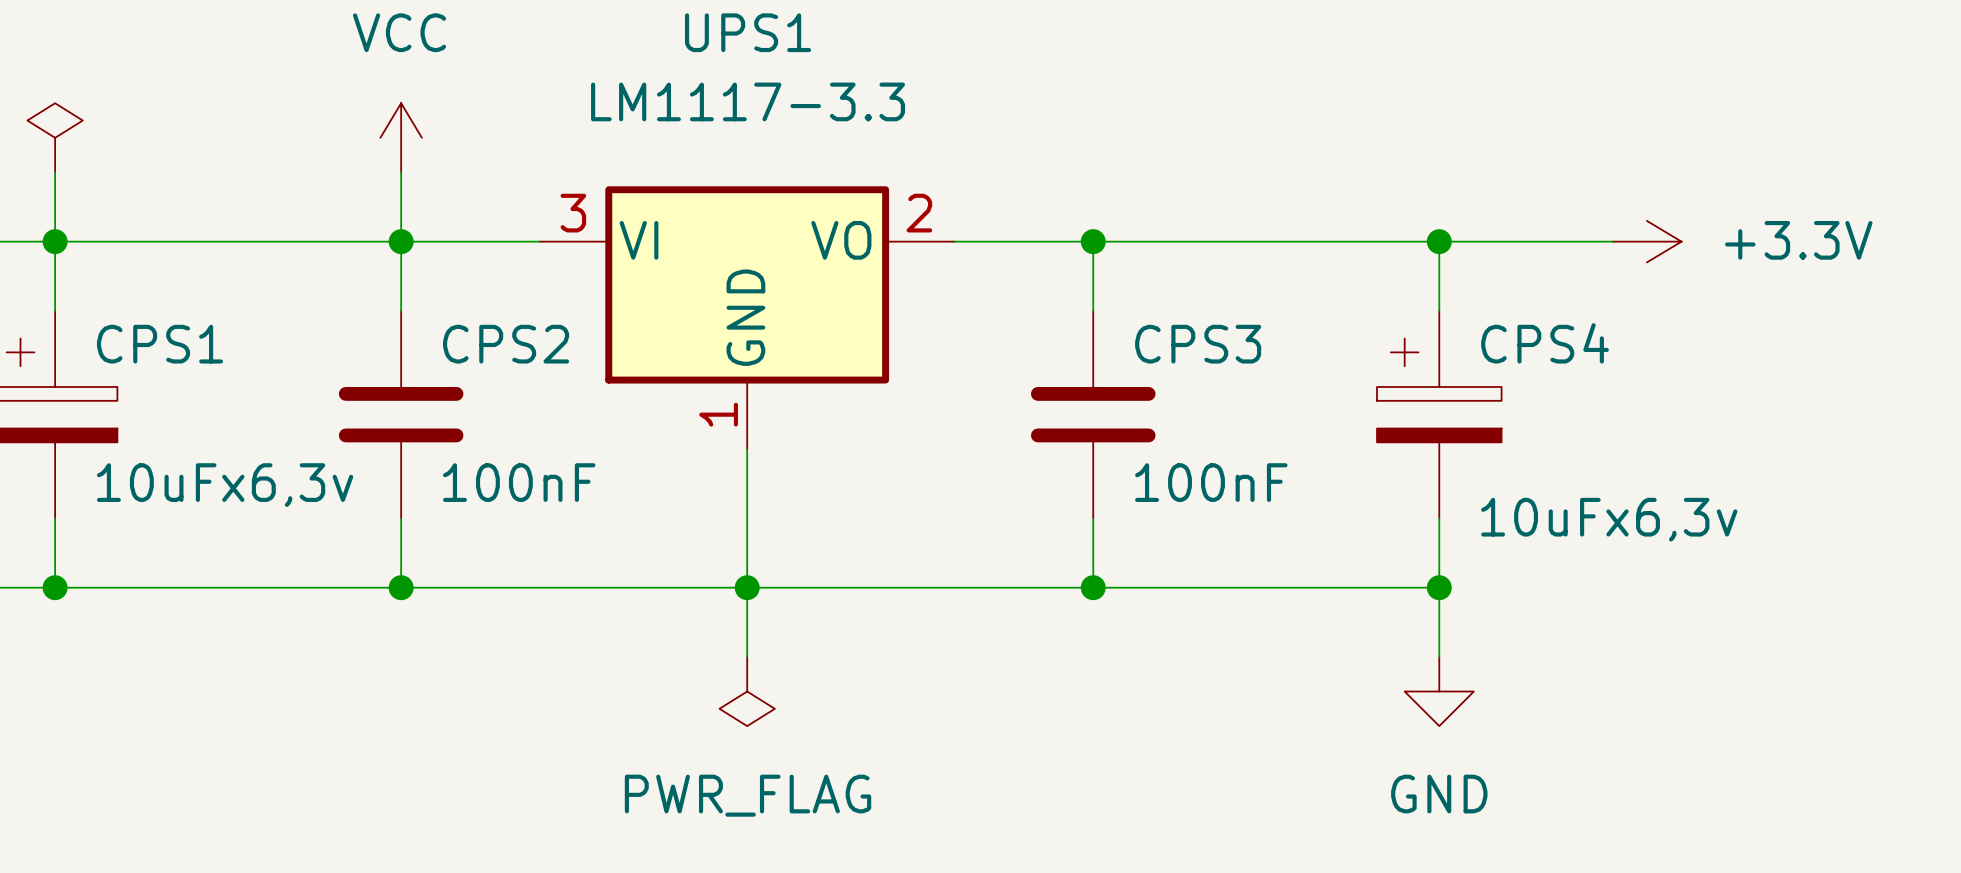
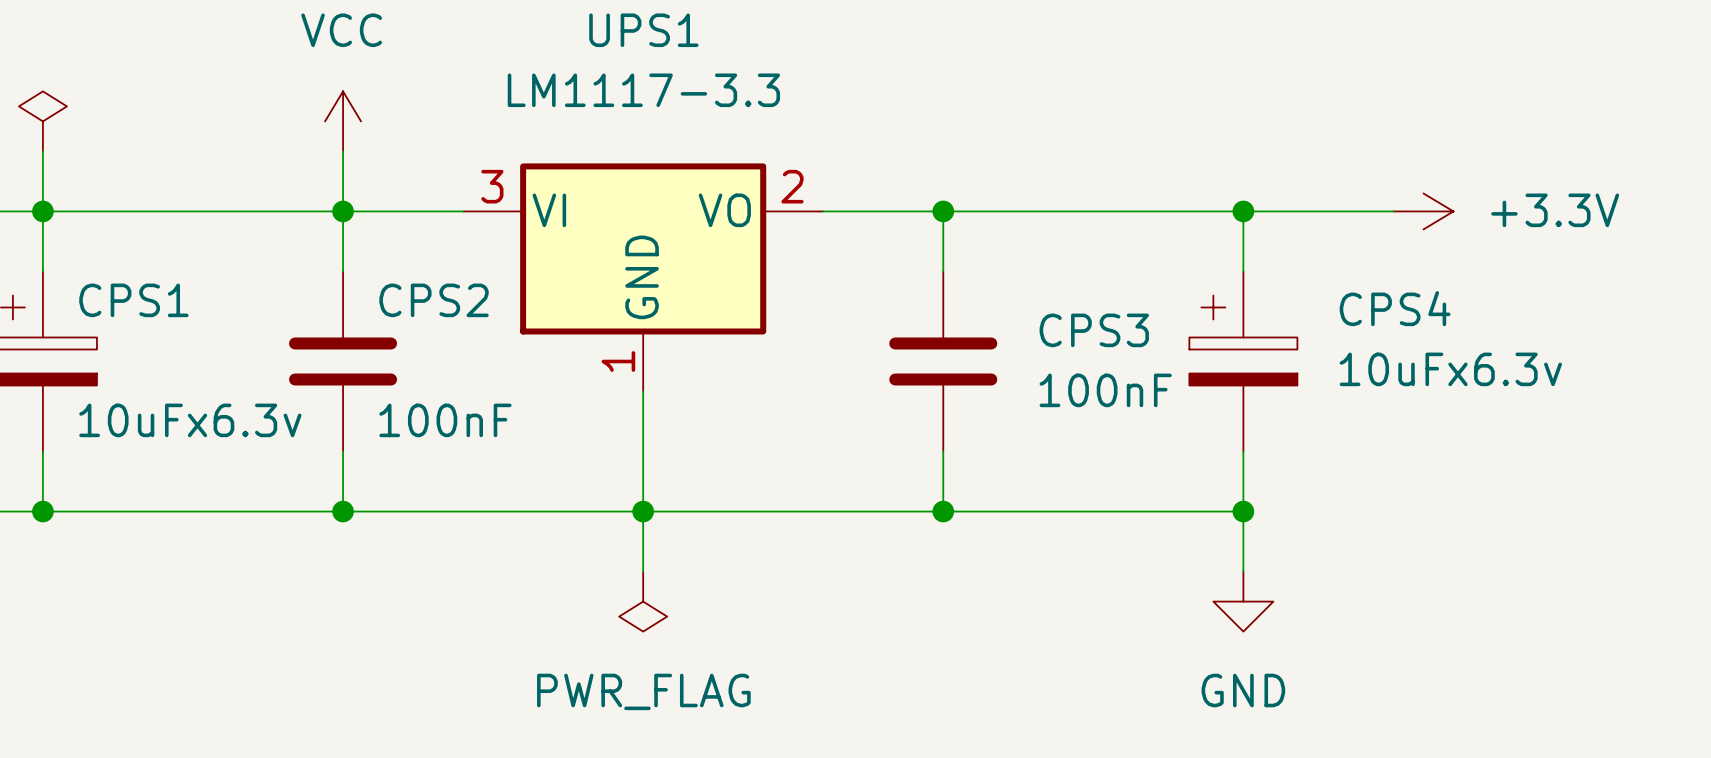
CPS4 name position: CPS4 (1545, 343) -> CPS4 (1395, 308)
CPS3 name position: CPS3 (1198, 344) -> CPS3 (1094, 330)
CPS3 value position: 100nF (1211, 482) -> 100nF (1105, 390)
CPS1 value: 10uFx6,3v (225, 485) -> 10uFx6.3v (190, 420)
CPS4 value: 10uFx6,3v (1609, 519) -> 10uFx6.3v (1450, 369)

